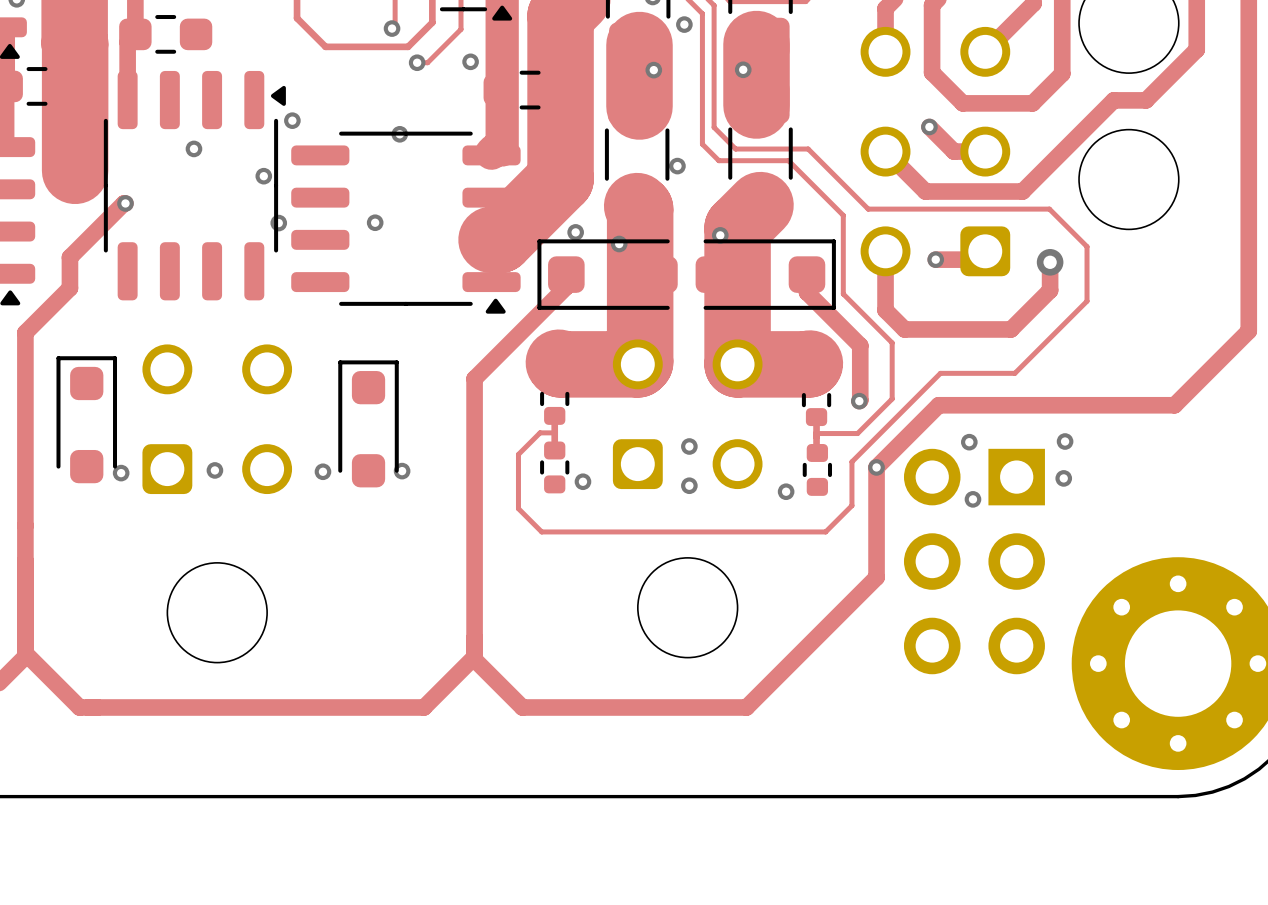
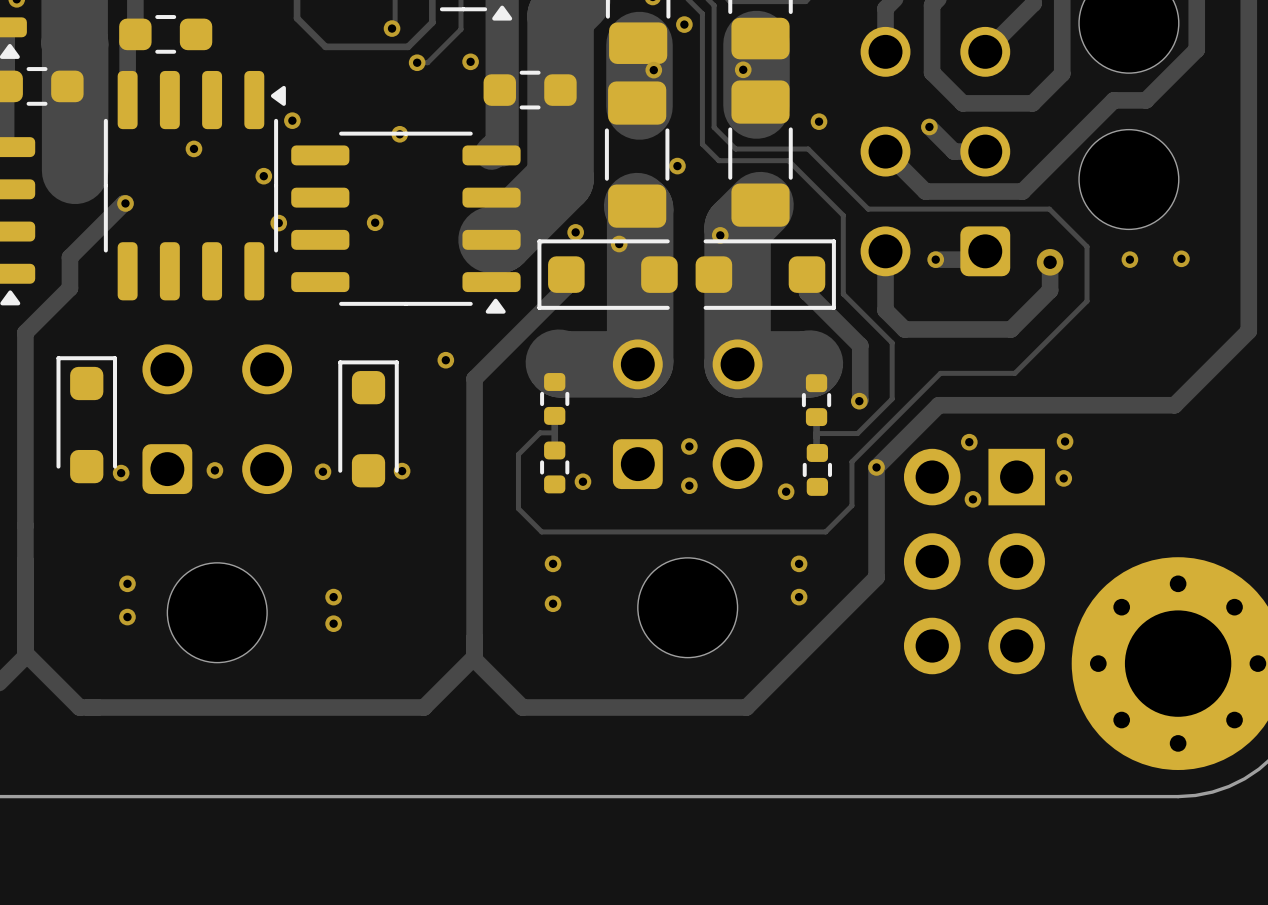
via: none -> (819, 121)
via: none -> (1181, 258)
via: none -> (1129, 259)
via: none -> (445, 360)
via: none -> (553, 563)
via: none -> (799, 563)
via: none -> (127, 583)
via: none -> (333, 597)
via: none -> (799, 597)
via: none -> (553, 603)
via: none -> (127, 617)
via: none -> (333, 623)

